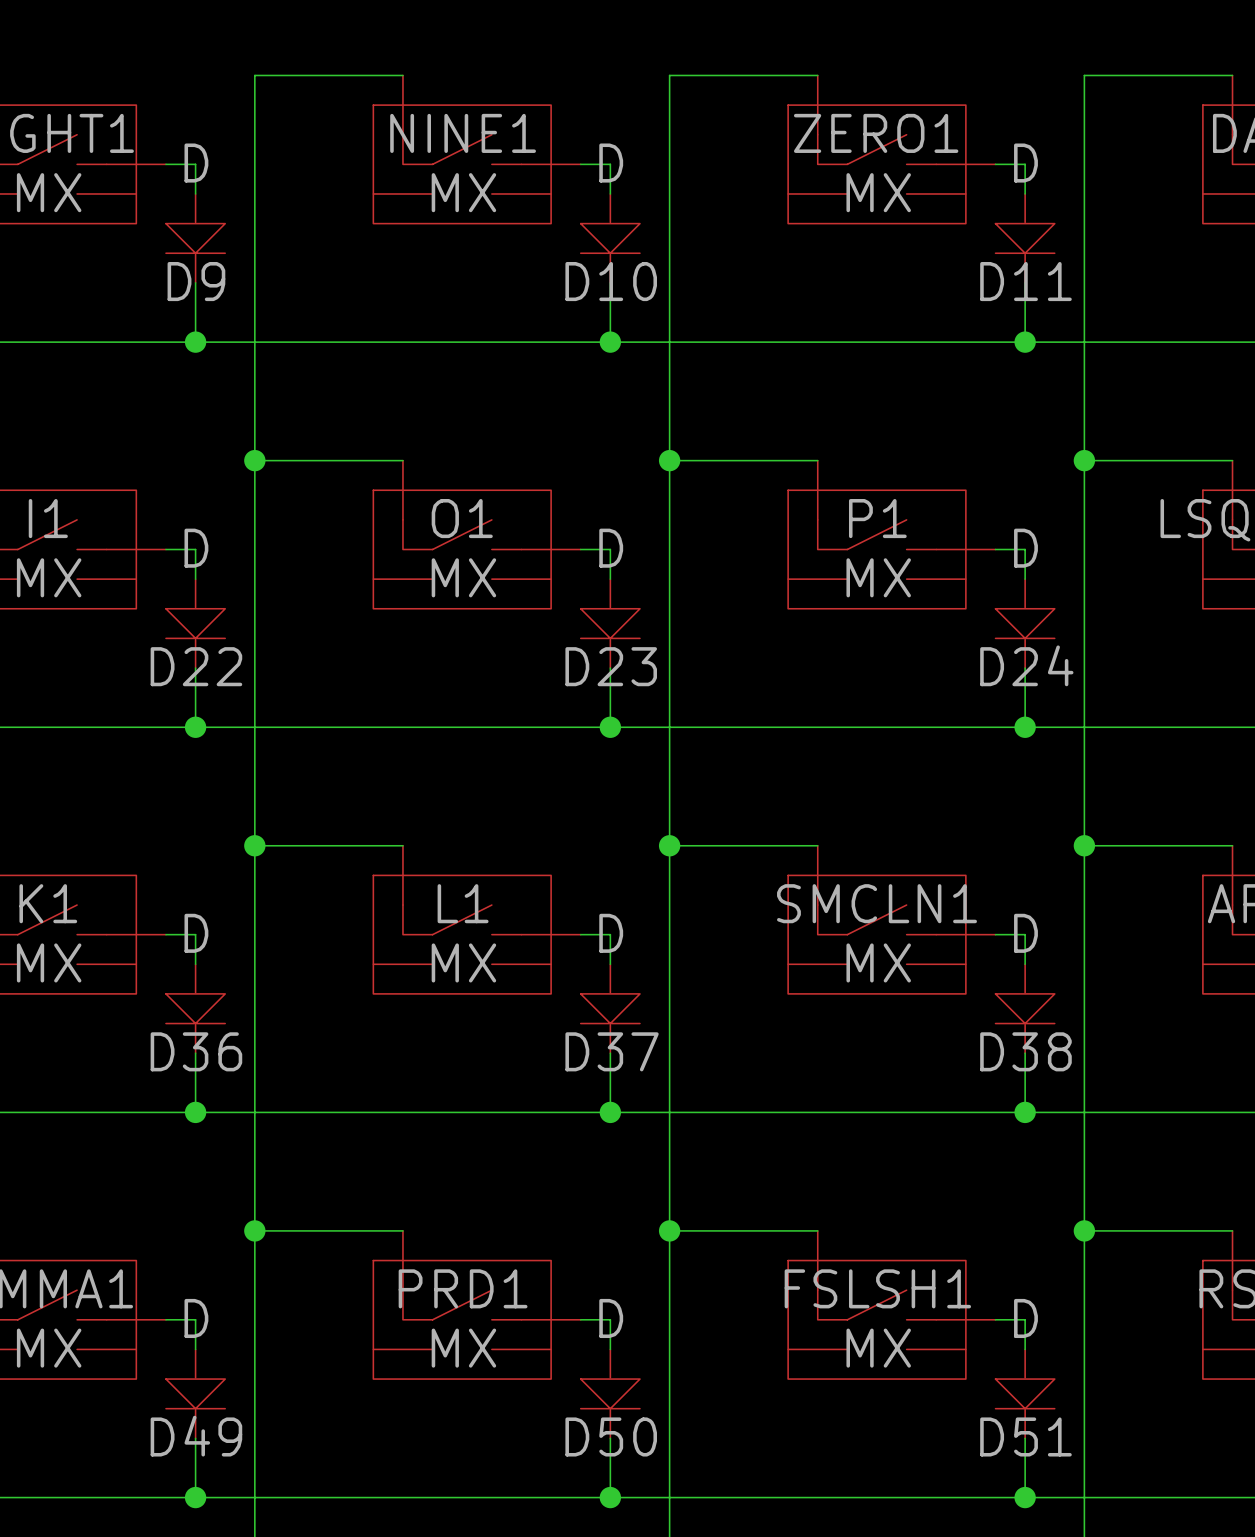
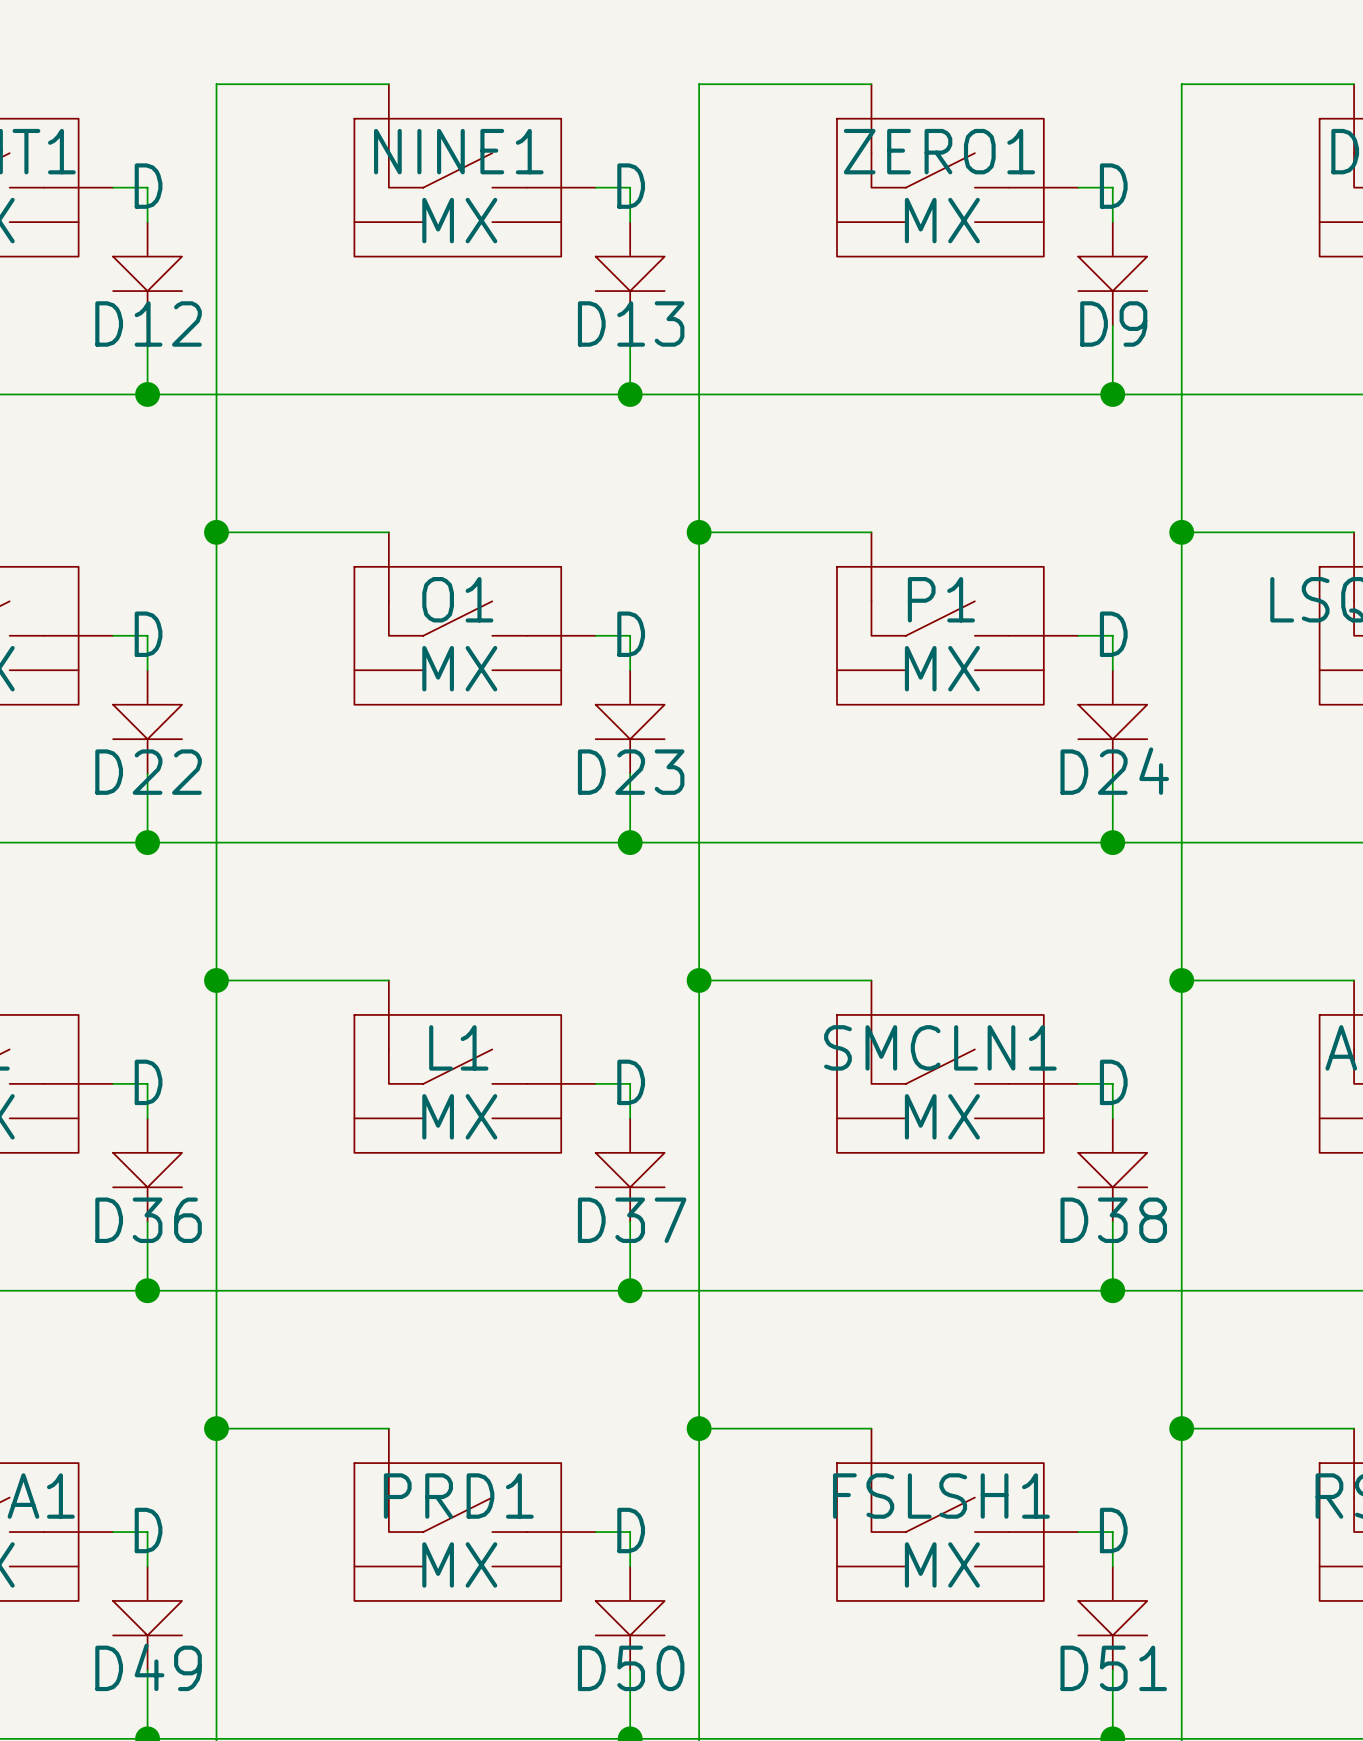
D9 name: D9 (196, 281) -> D12 (148, 323)
D10 name: D10 (611, 281) -> D13 (631, 323)
D11 name: D11 (1025, 281) -> D9 (1113, 323)

